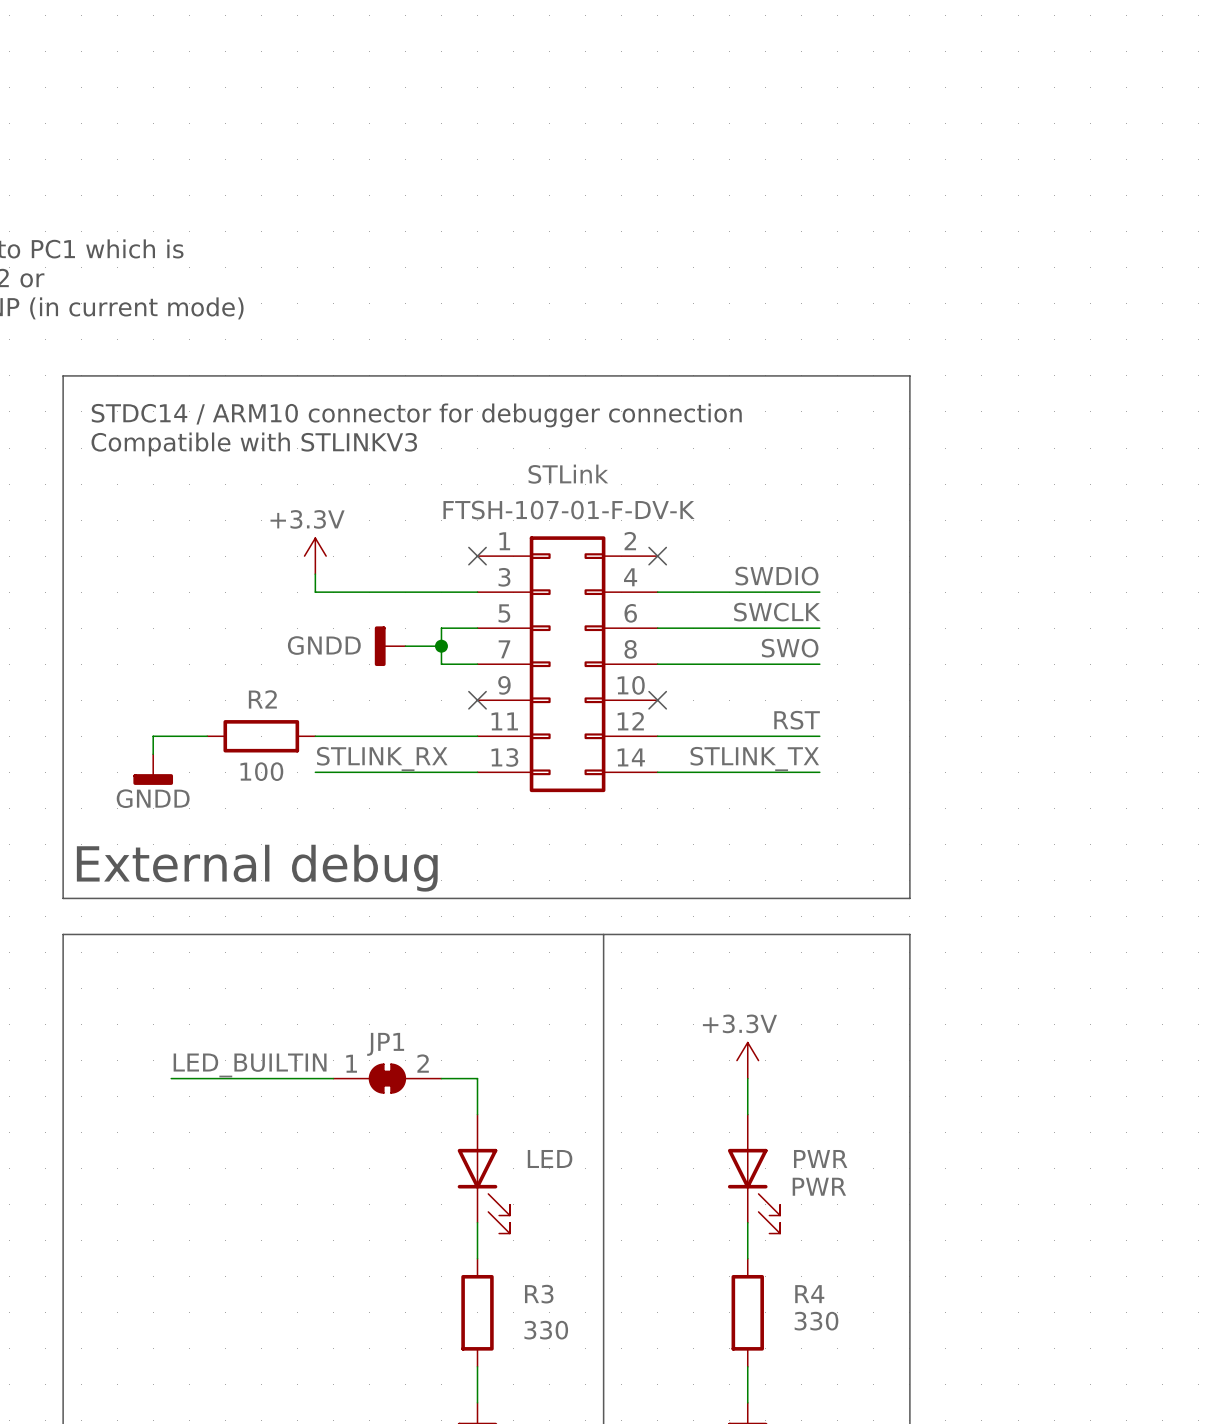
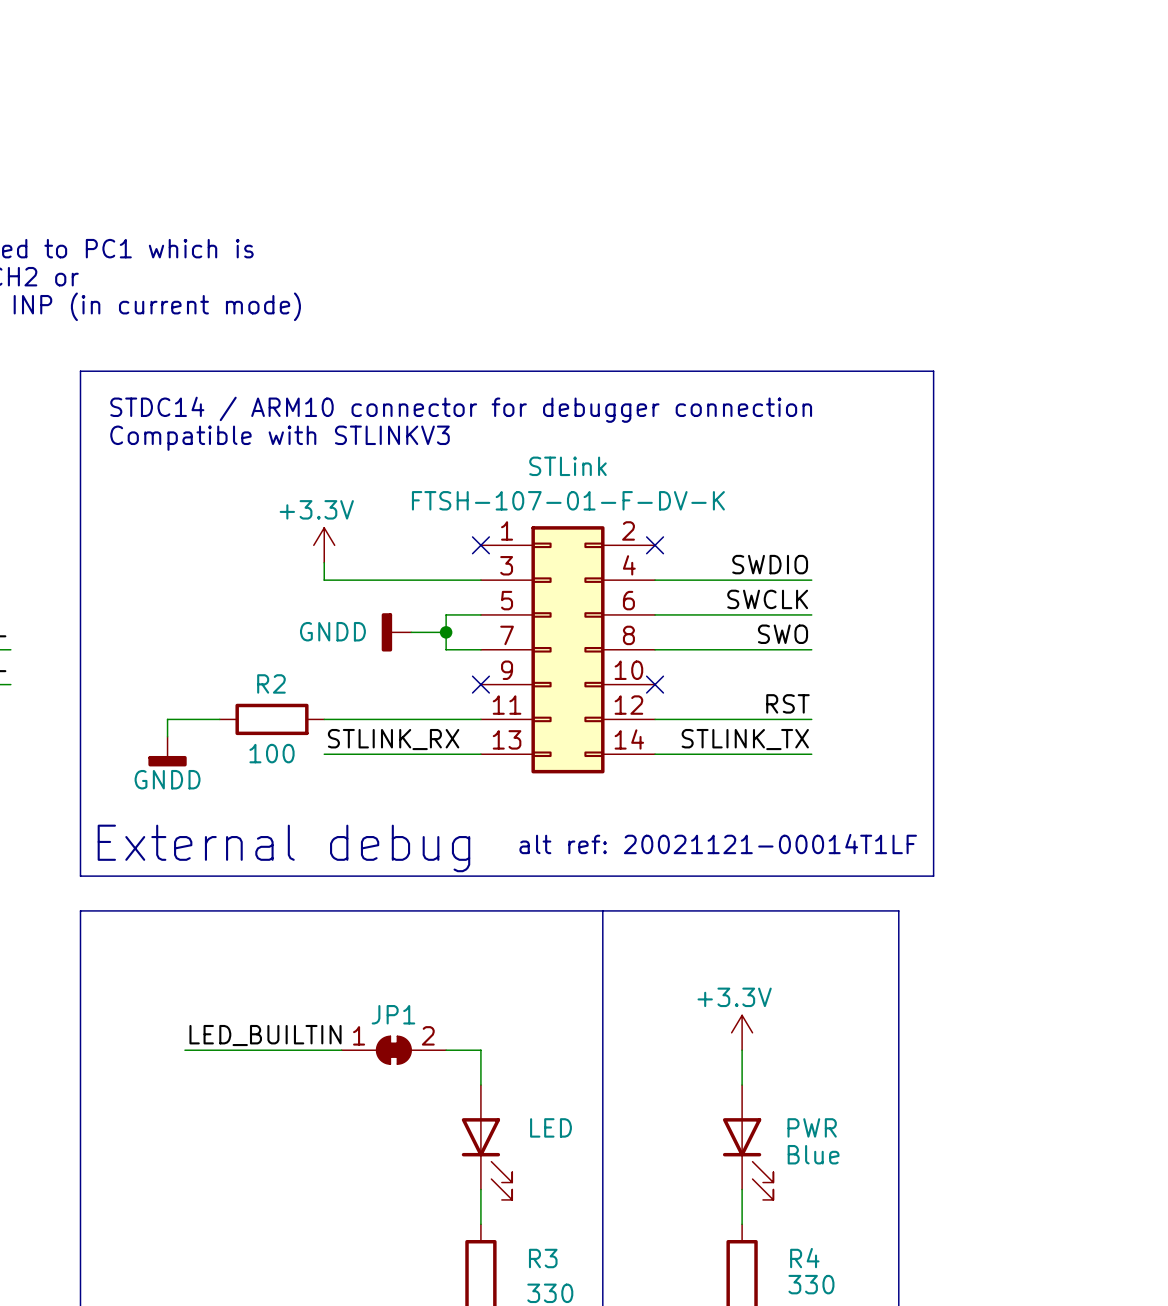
line: (909, 375) (909, 898) -> (898, 371) (933, 371) (933, 876) (898, 876)
text: none -> alt ref: 20021121-00014T1LF (718, 844)
part value: PWR (819, 1186) -> Blue (813, 1154)

